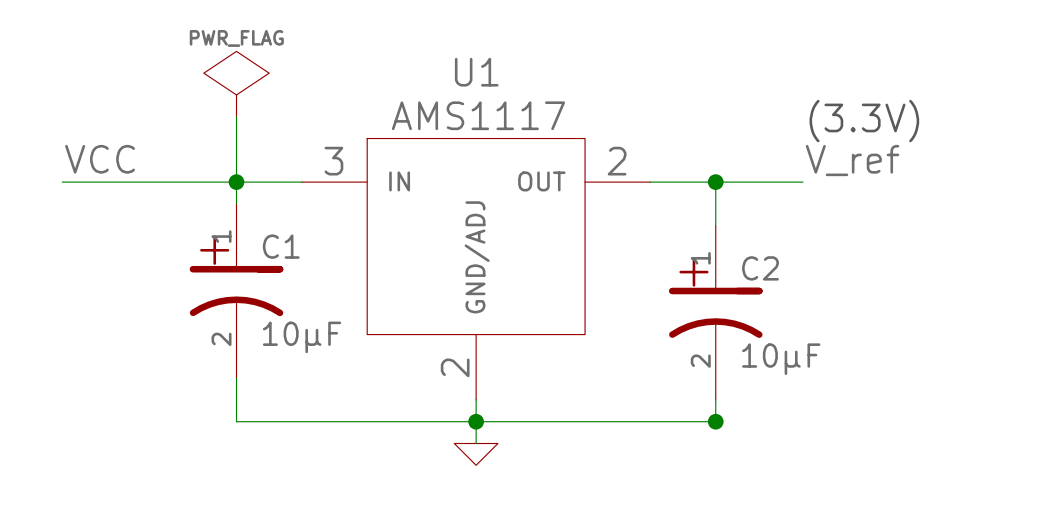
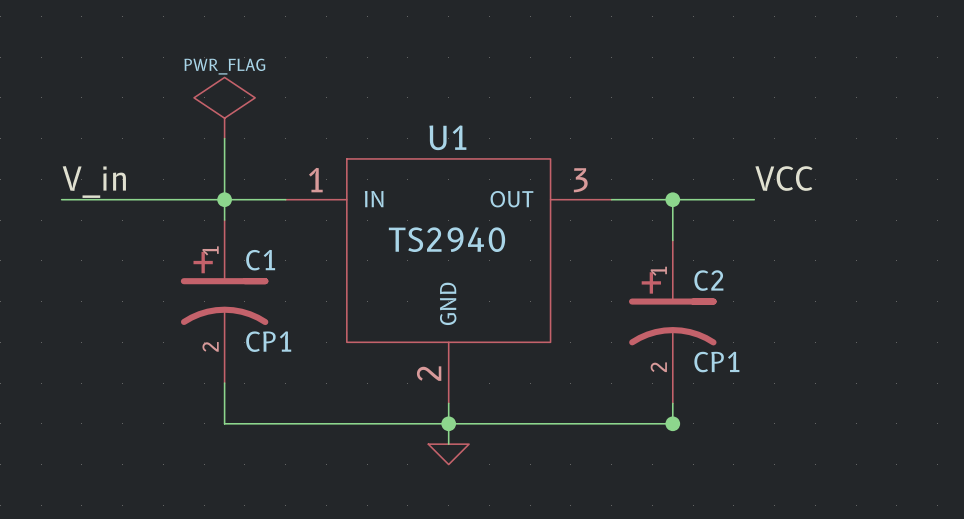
U1 name position: U1 (476, 72) -> U1 (447, 137)
U1 value: AMS1117 (478, 115) -> TS2940 (447, 239)
text: (3.3V) (864, 121) -> none
label: VCC (100, 159) -> V_in (94, 182)
label: V_ref (852, 160) -> VCC (783, 178)
U1 pin number: 3 (333, 161) -> 1 (315, 180)
U1 pin number: 2 (617, 161) -> 3 (580, 180)
U1 pin name: GND/ADJ (477, 257) -> GND (448, 303)
C1 value: 10µF (302, 337) -> CP1 (268, 341)
C2 value: 10µF (781, 359) -> CP1 (716, 362)

